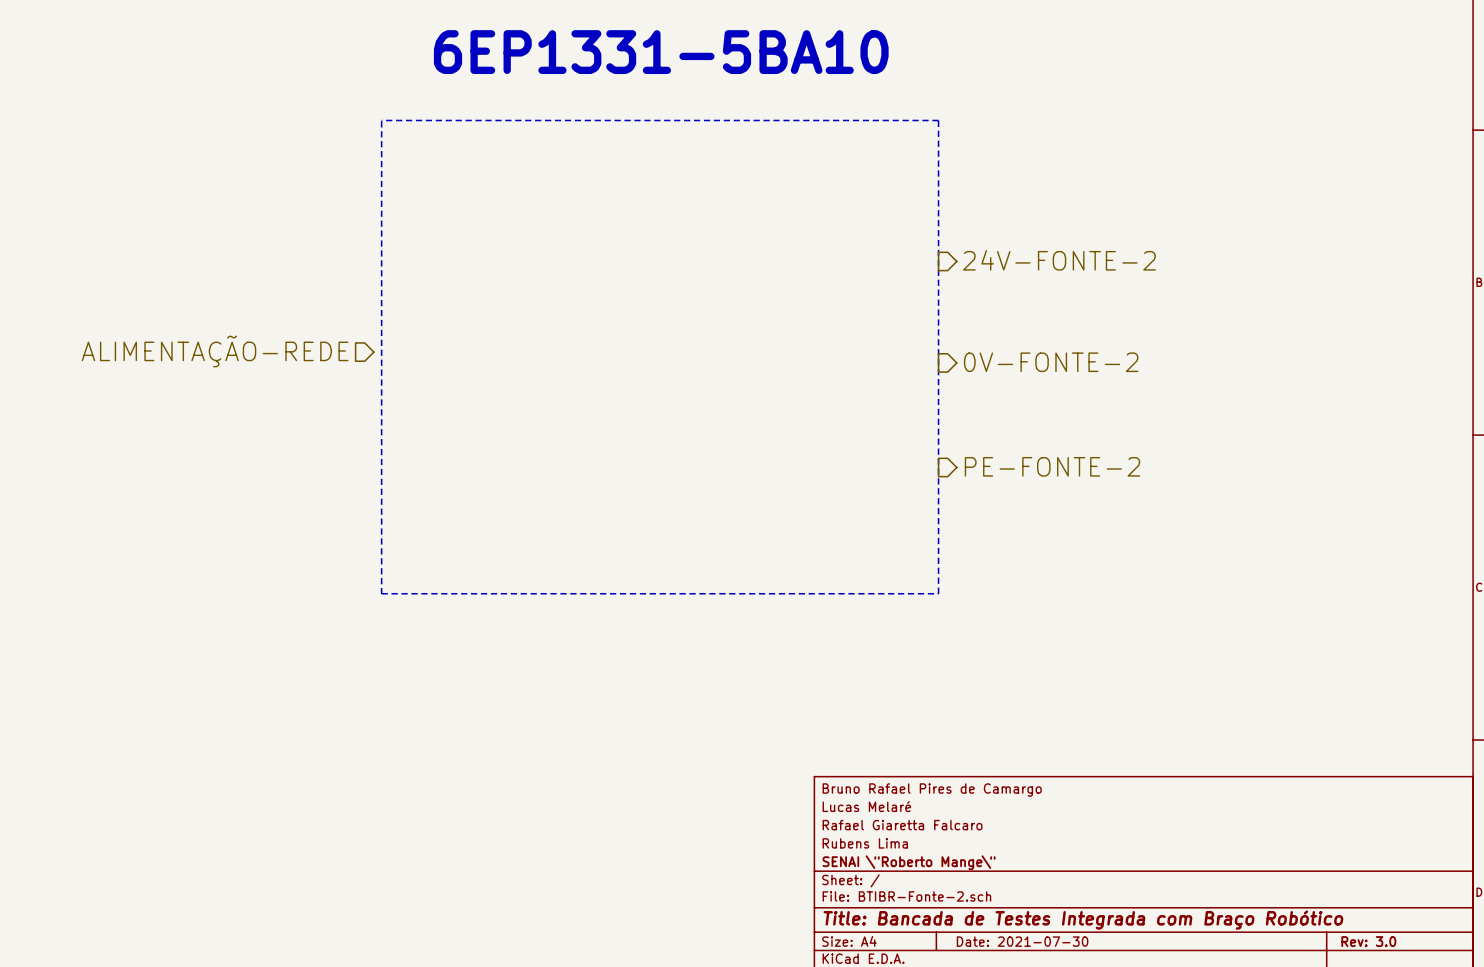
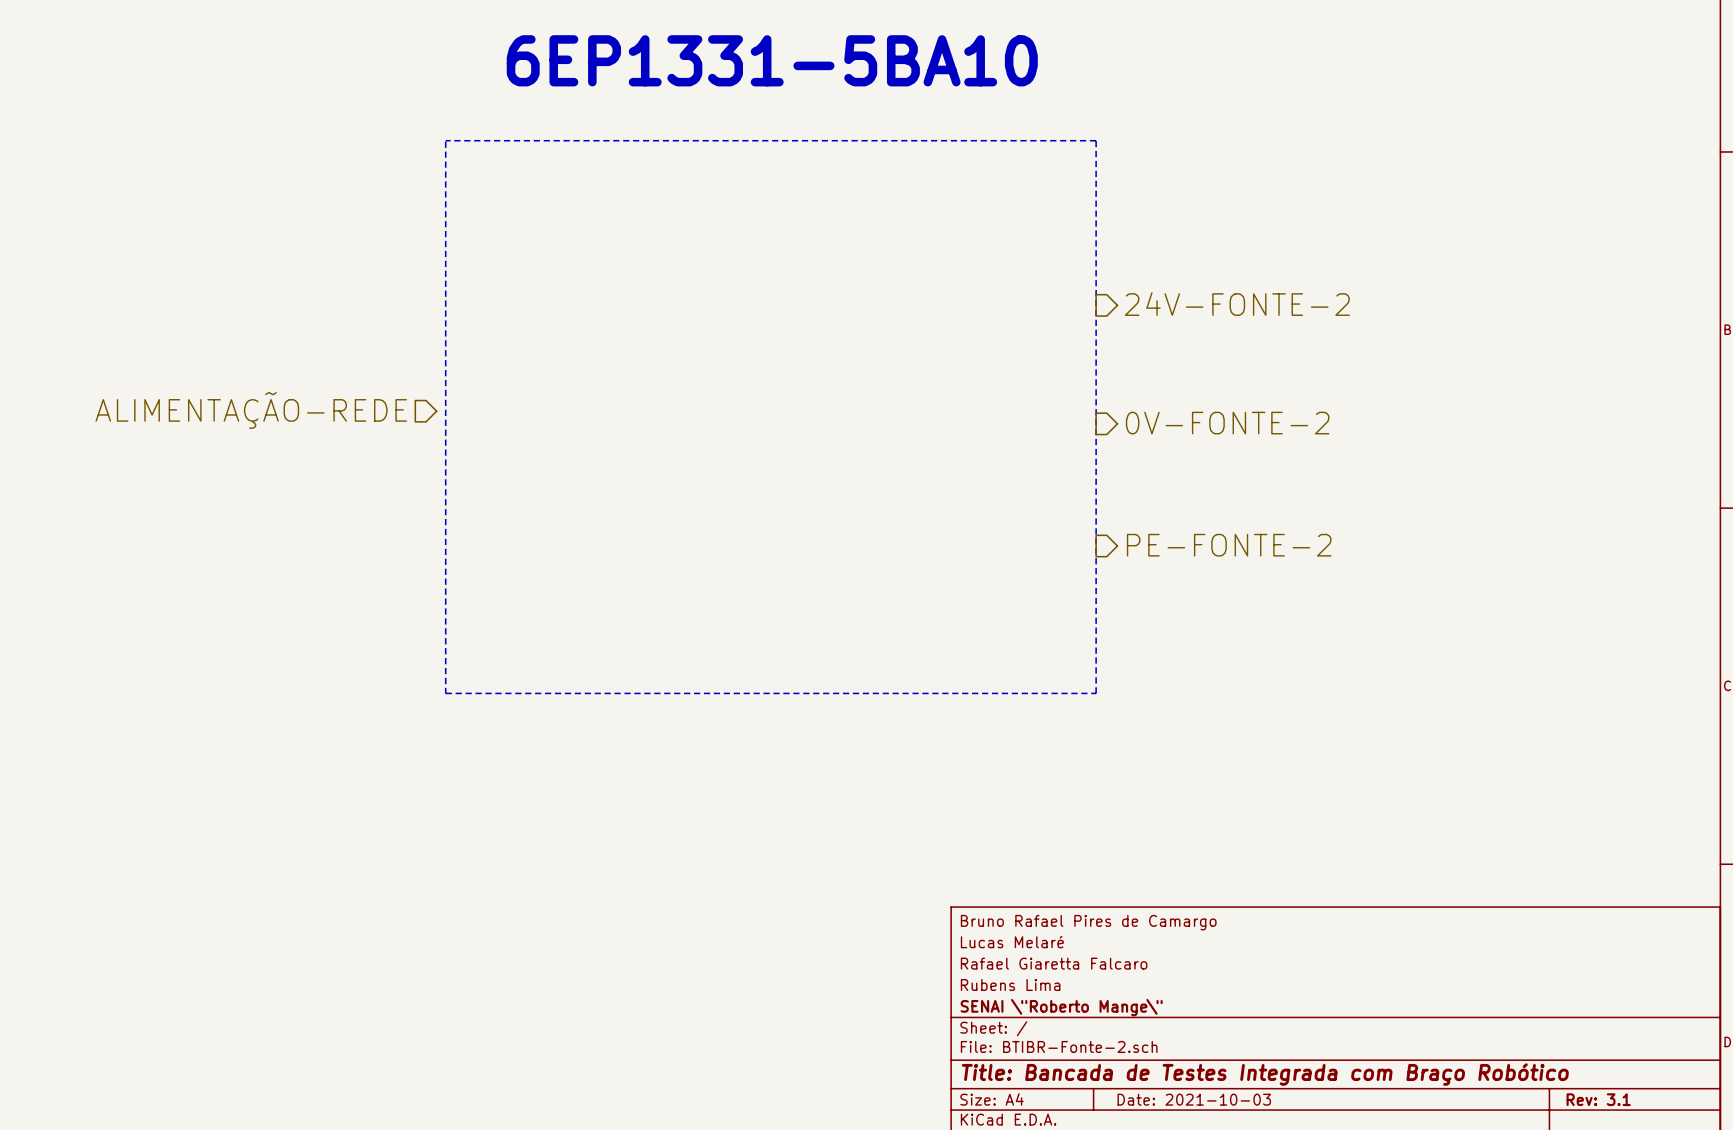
title block: Date: 2021-07-30 (1022, 941) -> Date: 2021-10-03 (1194, 1099)
title block: Rev: 3.0 (1368, 941) -> Rev: 3.1 (1598, 1099)

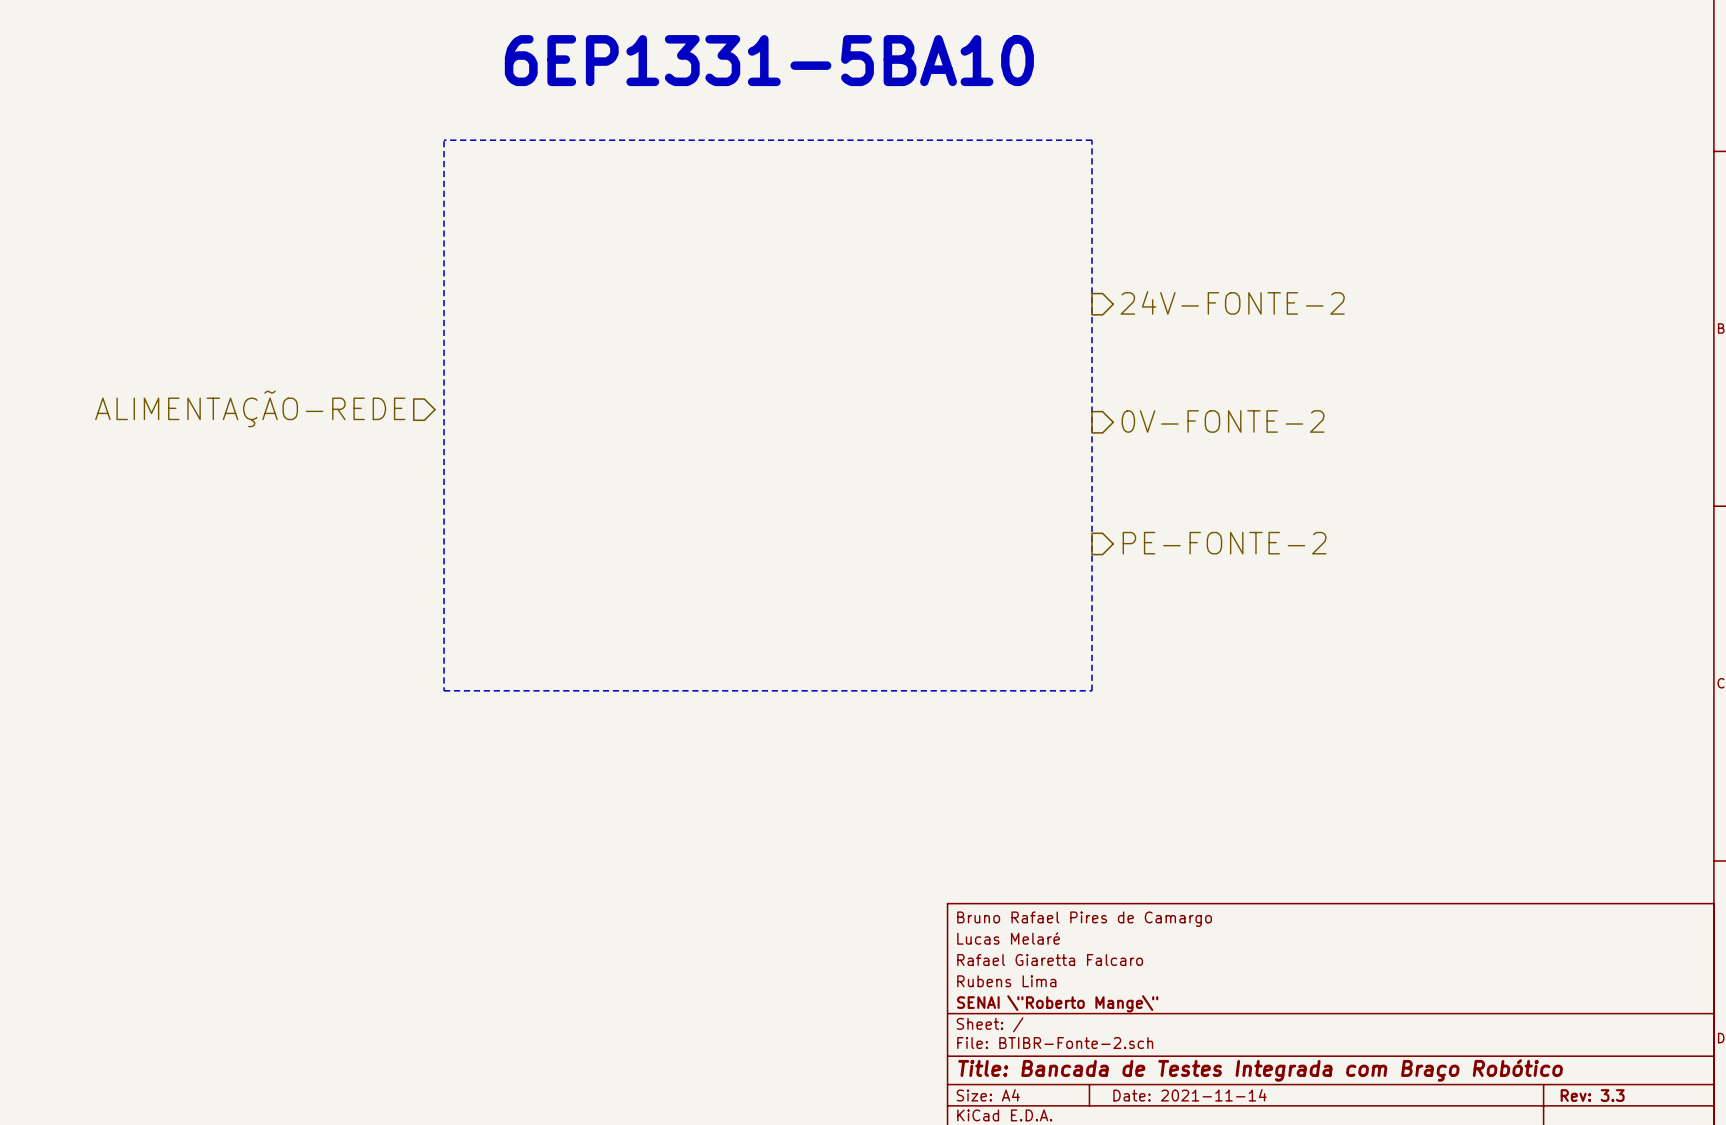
title block: Date: 2021-10-03 (1194, 1099) -> Date: 2021-11-14 (1190, 1095)
title block: Rev: 3.1 (1598, 1099) -> Rev: 3.3 (1592, 1095)

